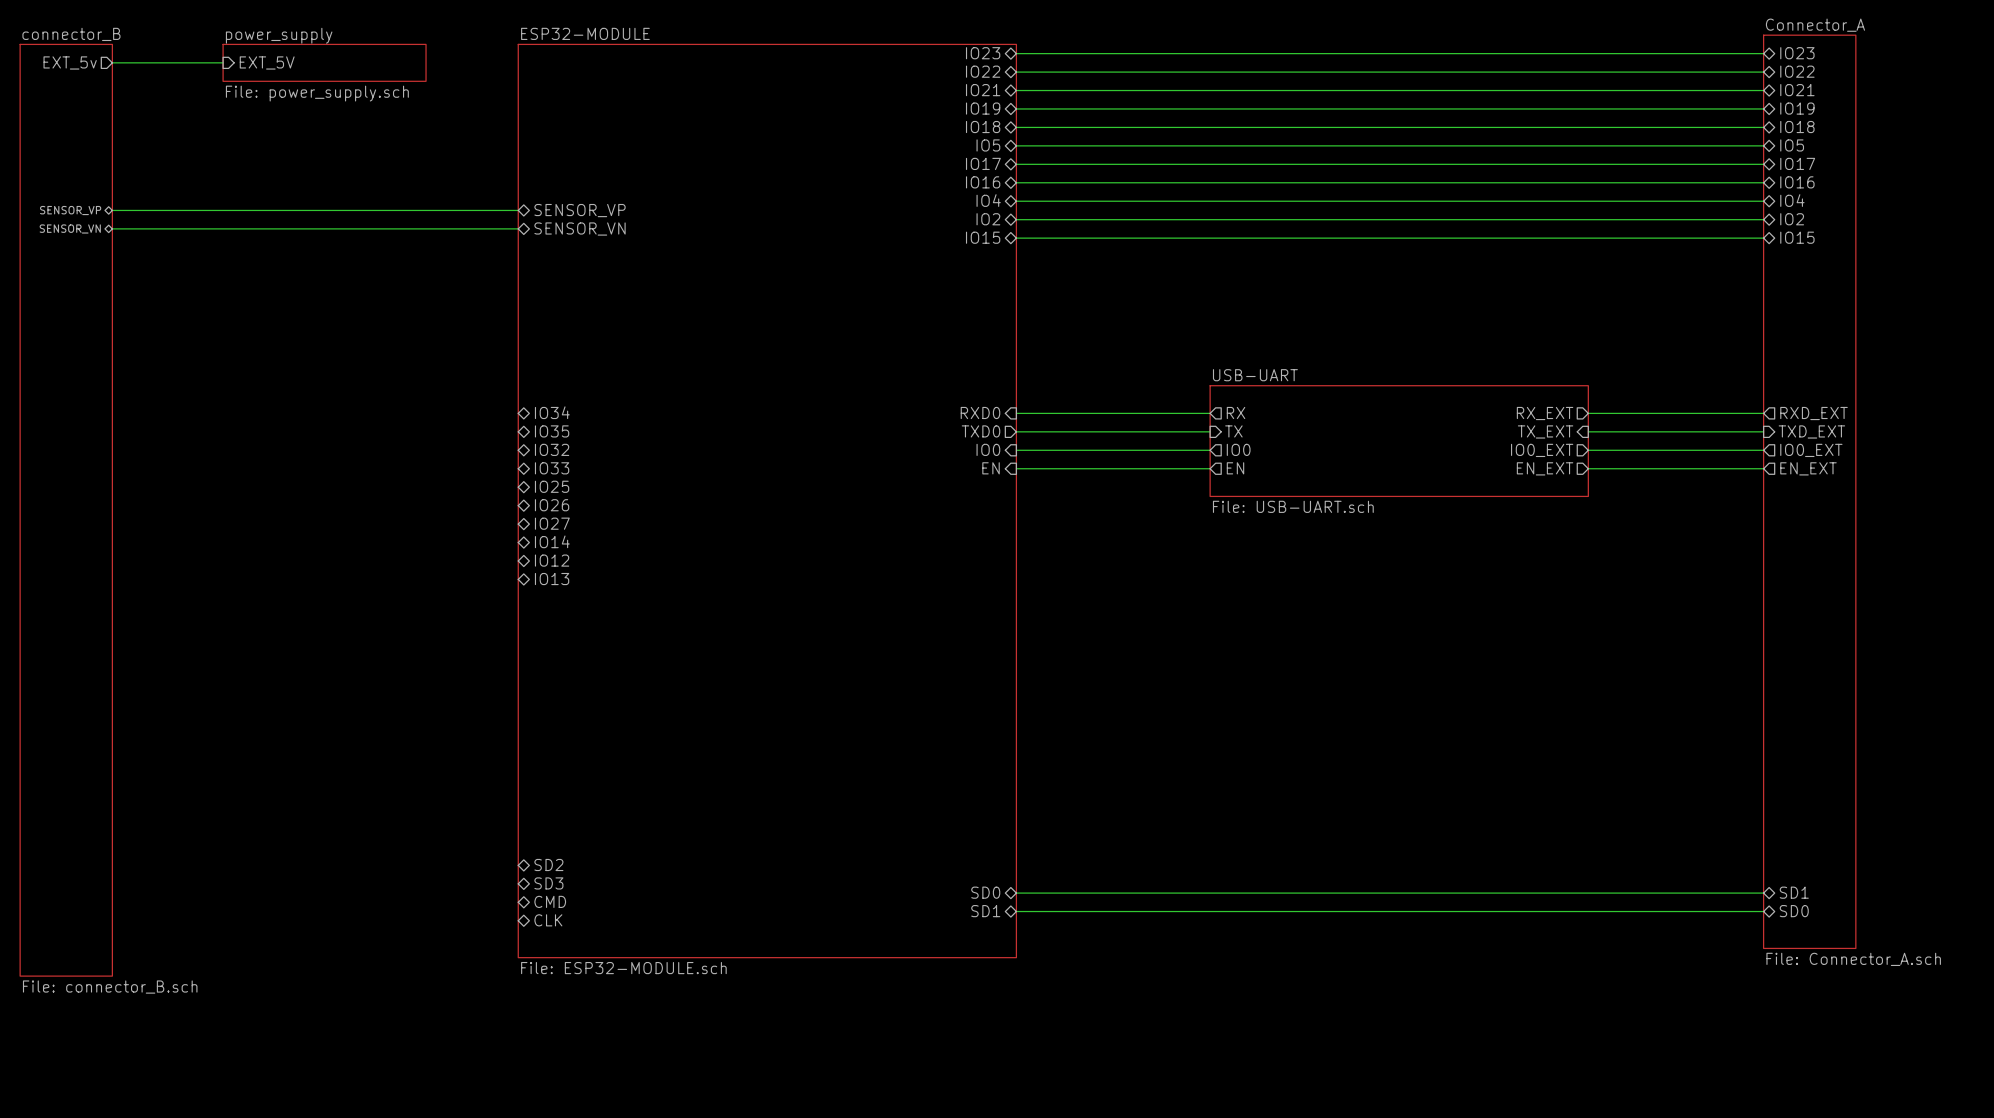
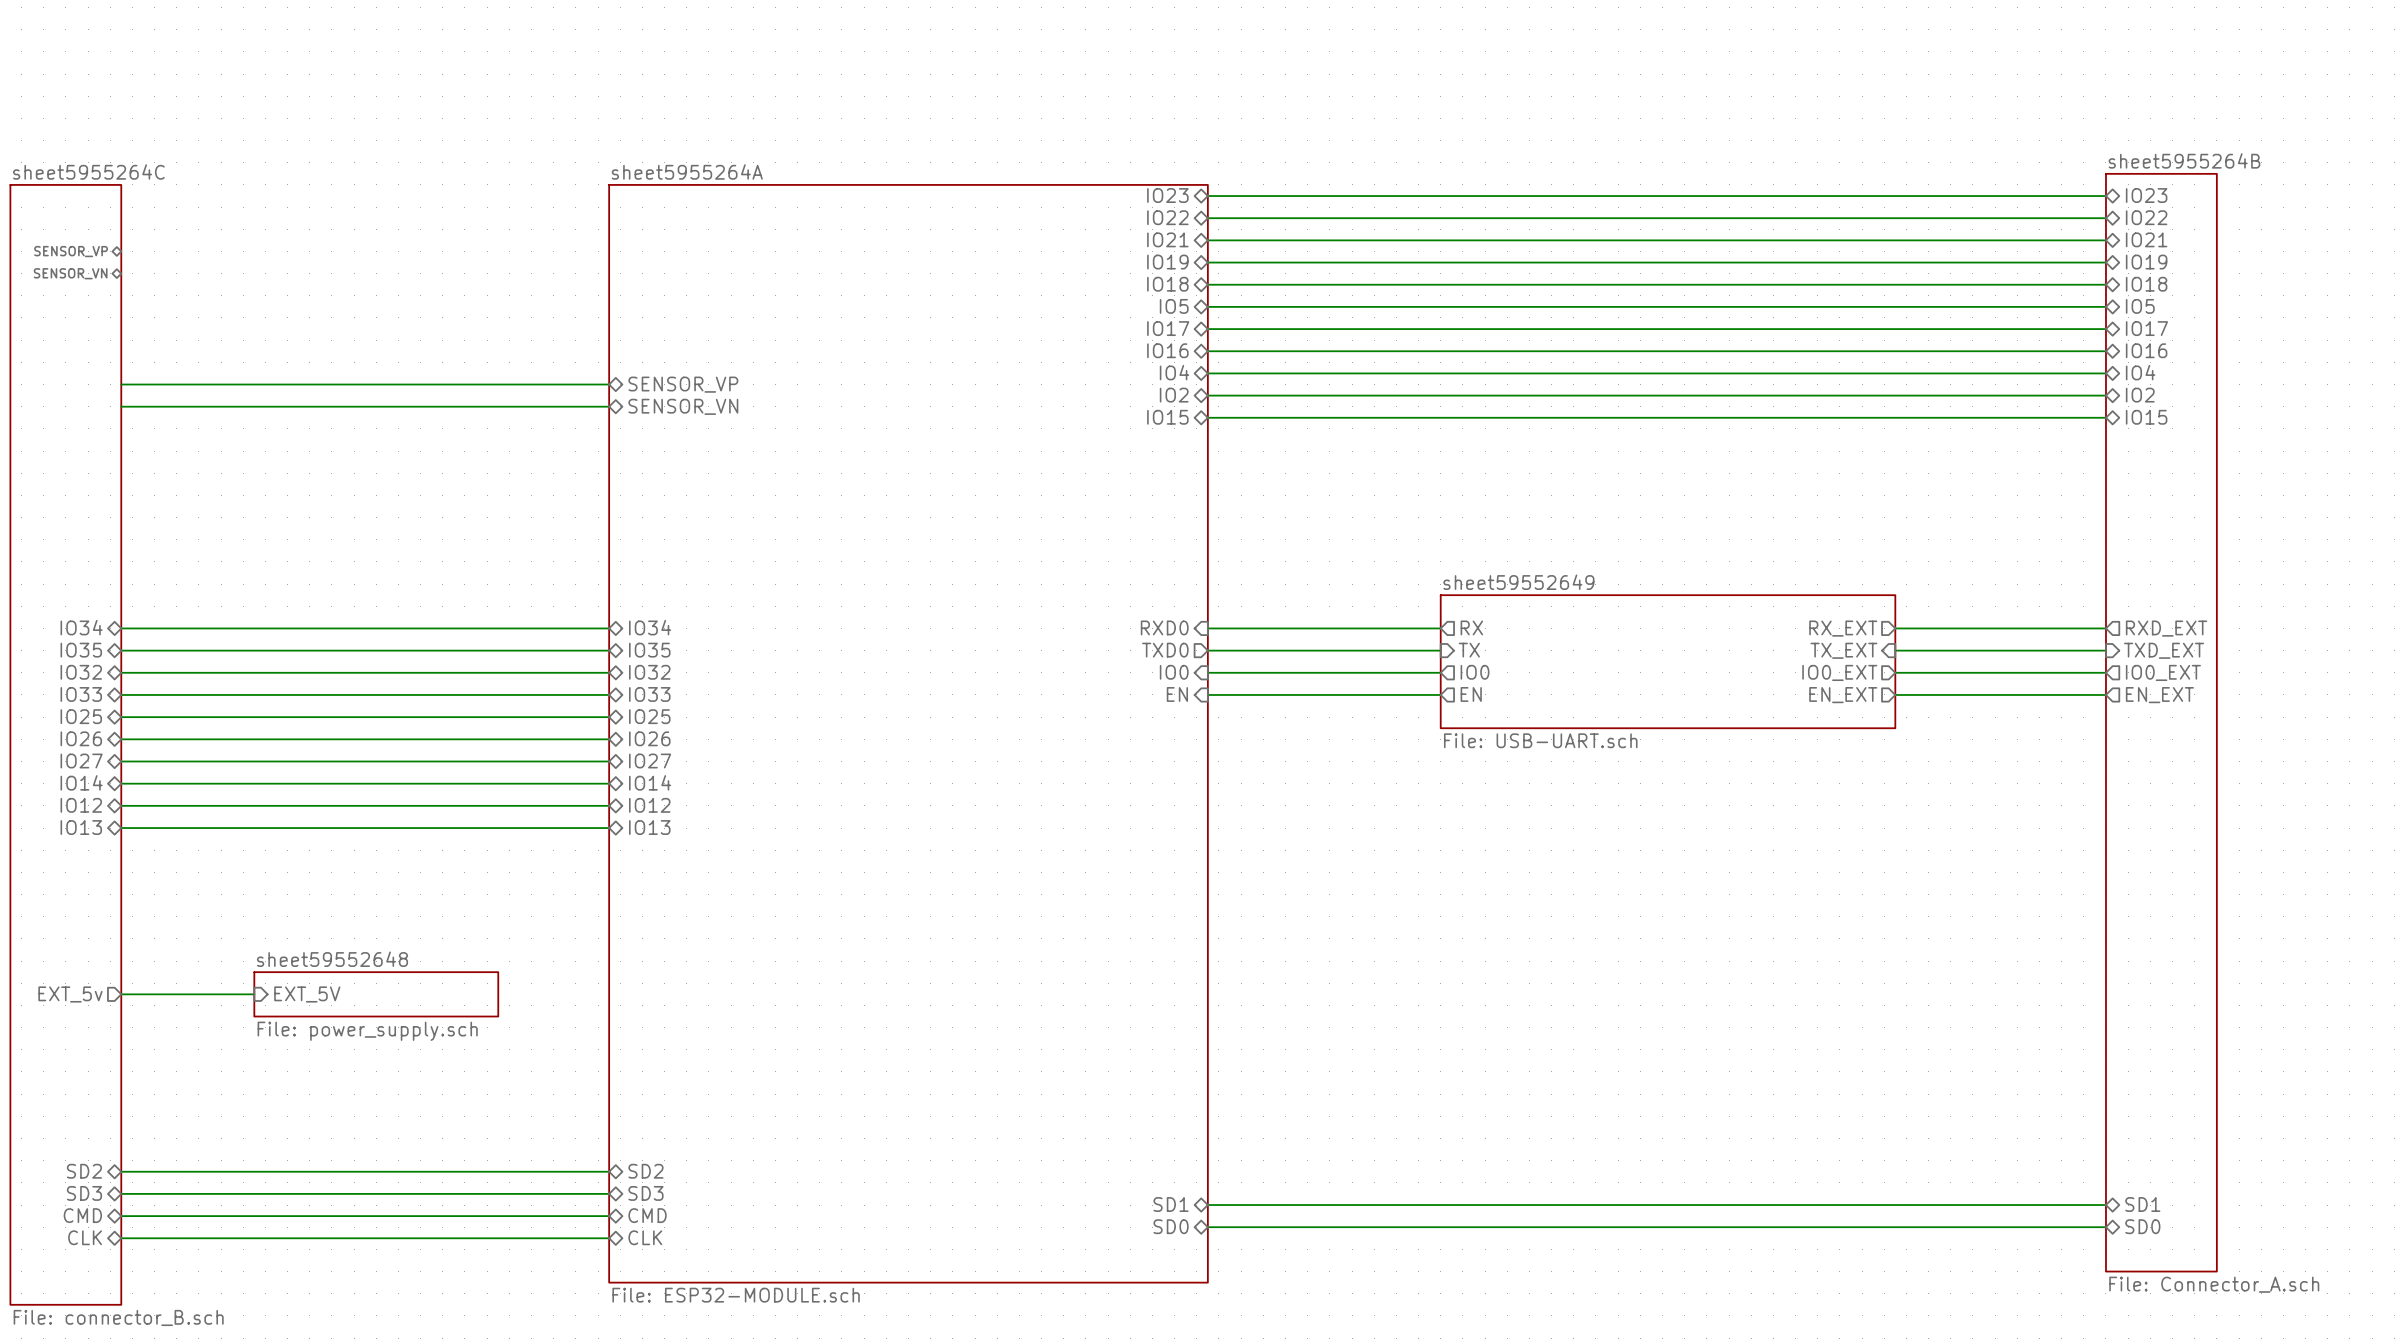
sheet pin: IO23 (983, 53) -> none
wire: (1016, 53) (1763, 53) -> none
sheet pin: IO23 (1797, 53) -> none
sheet pin: EXT_5v (70, 62) -> none
wire: (112, 62) (223, 62) -> none
sheet pin: EXT_5V (267, 62) -> none
sheet power_supply: File: power_supply.sch (324, 62) -> none
sheet pin: IO22 (983, 71) -> none
sheet pin: IO22 (1797, 71) -> none
wire: (1016, 72) (1763, 72) -> none
sheet pin: IO21 (983, 90) -> none
wire: (1016, 90) (1763, 90) -> none
sheet pin: IO21 (1797, 90) -> none
sheet pin: IO19 (983, 108) -> none
wire: (1016, 108) (1763, 108) -> none
sheet pin: IO19 (1797, 108) -> none
sheet pin: IO18 (983, 127) -> none
wire: (1016, 127) (1763, 127) -> (1207, 329) (2105, 329)
sheet pin: IO18 (1797, 127) -> none
sheet pin position: IO5 (988, 145) -> IO5 (1174, 306)
wire: (1016, 145) (1763, 145) -> (1207, 306) (2105, 306)
sheet pin position: IO5 (1792, 145) -> IO5 (2140, 306)
sheet pin: IO17 (983, 163) -> IO23 (1167, 195)
sheet pin: IO17 (1797, 163) -> IO23 (2146, 195)
sheet pin: IO16 (983, 182) -> IO22 (1167, 217)
sheet pin: IO16 (1797, 182) -> IO22 (2146, 217)
sheet pin: IO4 (988, 200) -> IO21 (1167, 239)
sheet pin: IO4 (1792, 200) -> IO21 (2146, 239)
wire: (112, 210) (518, 210) -> (121, 384) (609, 384)
sheet pin position: SENSOR_VP (580, 210) -> SENSOR_VP (683, 384)
sheet pin: IO2 (988, 219) -> IO19 (1167, 262)
sheet pin: IO2 (1792, 219) -> IO19 (2146, 262)
wire: (112, 228) (518, 228) -> (121, 406) (609, 406)
sheet pin position: SENSOR_VN (580, 229) -> SENSOR_VN (683, 406)
sheet pin: IO15 (983, 237) -> IO18 (1167, 284)
sheet pin: IO15 (1797, 237) -> IO18 (2146, 284)
sheet pin: none -> IO17 (1168, 328)
sheet pin: none -> IO17 (2146, 328)
sheet pin: none -> IO16 (1167, 350)
wire: none -> (1207, 351) (2105, 351)
sheet pin: none -> IO16 (2146, 350)
sheet pin: none -> IO4 (1174, 372)
wire: none -> (1207, 373) (2105, 373)
sheet pin: none -> IO4 (2140, 372)
sheet pin: none -> IO2 (1174, 395)
sheet pin: none -> IO2 (2140, 395)
wire: none -> (1207, 395) (2105, 395)
sheet pin: none -> IO15 (1167, 417)
wire: none -> (1207, 417) (2105, 417)
sheet pin: none -> IO15 (2146, 417)
sheet pin: IO34 (552, 412) -> none
sheet pin position: RXD0 (980, 412) -> RXD0 (1164, 627)
sheet pin position: RX (1236, 412) -> RX (1471, 627)
wire: (1016, 413) (1210, 413) -> (1207, 628) (1440, 628)
sheet pin position: RX_EXT (1545, 413) -> RX_EXT (1843, 628)
wire: (1588, 413) (1763, 413) -> (1895, 628) (2105, 628)
sheet pin position: RXD_EXT (1814, 413) -> RXD_EXT (2166, 628)
sheet pin: IO35 (552, 431) -> none
sheet pin position: TXD0 (981, 431) -> TXD0 (1165, 650)
wire: (1016, 431) (1210, 431) -> (1207, 650) (1440, 650)
sheet pin position: TX (1233, 431) -> TX (1469, 650)
sheet pin position: TX_EXT (1545, 431) -> TX_EXT (1843, 650)
wire: (1588, 431) (1763, 431) -> (1895, 650) (2105, 650)
sheet pin position: TXD_EXT (1811, 431) -> TXD_EXT (2164, 650)
sheet USB-UART: File: USB-UART.sch (1399, 441) -> none
sheet pin: IO32 (552, 449) -> none
sheet pin position: IO0 (988, 449) -> IO0 (1174, 672)
sheet pin position: IO0 (1238, 449) -> IO0 (1475, 672)
wire: (1016, 450) (1210, 450) -> (1207, 672) (1440, 672)
sheet pin position: IO0_EXT (1542, 450) -> IO0_EXT (1839, 672)
wire: (1588, 450) (1763, 450) -> (1895, 672) (2105, 672)
sheet pin position: IO0_EXT (1811, 450) -> IO0_EXT (2163, 672)
sheet pin: IO33 (552, 468) -> none
sheet pin position: EN (991, 468) -> EN (1177, 694)
wire: (1016, 468) (1210, 468) -> (1207, 694) (1440, 694)
sheet pin position: EN (1235, 468) -> EN (1471, 694)
sheet pin position: EN_EXT (1545, 468) -> EN_EXT (1843, 695)
wire: (1588, 468) (1763, 468) -> (1895, 694) (2105, 694)
sheet pin position: EN_EXT (1808, 468) -> EN_EXT (2159, 695)
sheet pin position: IO25 (552, 486) -> IO25 (649, 716)
sheet Connector_A: File: Connector_A.sch (1809, 491) -> none
sheet ESP32-MODULE: File: ESP32-MODULE.sch (767, 501) -> none
sheet pin position: IO26 (552, 505) -> IO26 (649, 738)
sheet connector_B: File: connector_B.sch (66, 510) -> none
sheet pin: none -> IO34 (81, 627)
sheet pin: IO27 (552, 523) -> IO34 (650, 627)
wire: none -> (121, 628) (609, 628)
sheet pin: IO14 (552, 541) -> IO35 (649, 650)
sheet pin: none -> IO35 (81, 650)
wire: none -> (121, 650) (609, 650)
sheet sheet59552649: none -> File: USB-UART.sch (1668, 661)
sheet pin: none -> IO32 (81, 672)
wire: none -> (121, 672) (609, 672)
sheet pin: IO12 (552, 560) -> IO32 (649, 672)
sheet pin: none -> IO33 (81, 694)
wire: none -> (121, 694) (609, 694)
sheet pin: IO13 (552, 579) -> IO33 (649, 694)
sheet pin: none -> IO25 (81, 716)
wire: none -> (121, 717) (609, 717)
sheet sheet5955264B: none -> File: Connector_A.sch (2161, 722)
sheet sheet5955264A: none -> File: ESP32-MODULE.sch (908, 733)
sheet pin: none -> IO26 (81, 738)
wire: none -> (121, 739) (609, 739)
sheet sheet5955264C: none -> File: connector_B.sch (65, 744)
sheet pin: none -> IO27 (81, 761)
wire: none -> (121, 761) (609, 761)
sheet pin: none -> IO27 (650, 761)
sheet pin: none -> IO14 (81, 782)
sheet pin: none -> IO14 (650, 782)
wire: none -> (121, 783) (609, 783)
sheet pin: none -> IO12 (81, 805)
wire: none -> (121, 805) (609, 805)
sheet pin: none -> IO12 (649, 805)
sheet pin: none -> IO13 (81, 827)
sheet pin: none -> IO13 (649, 827)
wire: none -> (121, 828) (609, 828)
sheet pin: none -> EXT_5v (70, 994)
wire: none -> (121, 994) (254, 994)
sheet pin: none -> EXT_5V (307, 994)
sheet sheet59552648: none -> File: power_supply.sch (376, 994)
sheet pin position: SD2 (548, 864) -> SD2 (645, 1171)
sheet pin position: SD3 (548, 883) -> SD3 (645, 1193)
sheet pin position: SD0 (985, 892) -> SD0 (1171, 1226)
sheet pin position: SD1 (1794, 892) -> SD1 (2142, 1204)
wire: (1016, 893) (1763, 893) -> (1207, 1205) (2105, 1205)
sheet pin position: CMD (550, 901) -> CMD (647, 1215)
sheet pin position: SD1 (985, 911) -> SD1 (1171, 1204)
wire: (1016, 911) (1763, 911) -> (1207, 1227) (2105, 1227)
sheet pin position: SD0 (1794, 911) -> SD0 (2142, 1226)
sheet pin position: CLK (548, 920) -> CLK (645, 1237)
sheet pin: none -> SD2 (84, 1171)
wire: none -> (121, 1171) (609, 1171)
sheet pin: none -> SD3 (84, 1193)
wire: none -> (121, 1193) (609, 1193)
sheet pin: none -> CMD (82, 1215)
wire: none -> (121, 1216) (609, 1216)
sheet pin: none -> CLK (85, 1237)
wire: none -> (121, 1238) (609, 1238)

